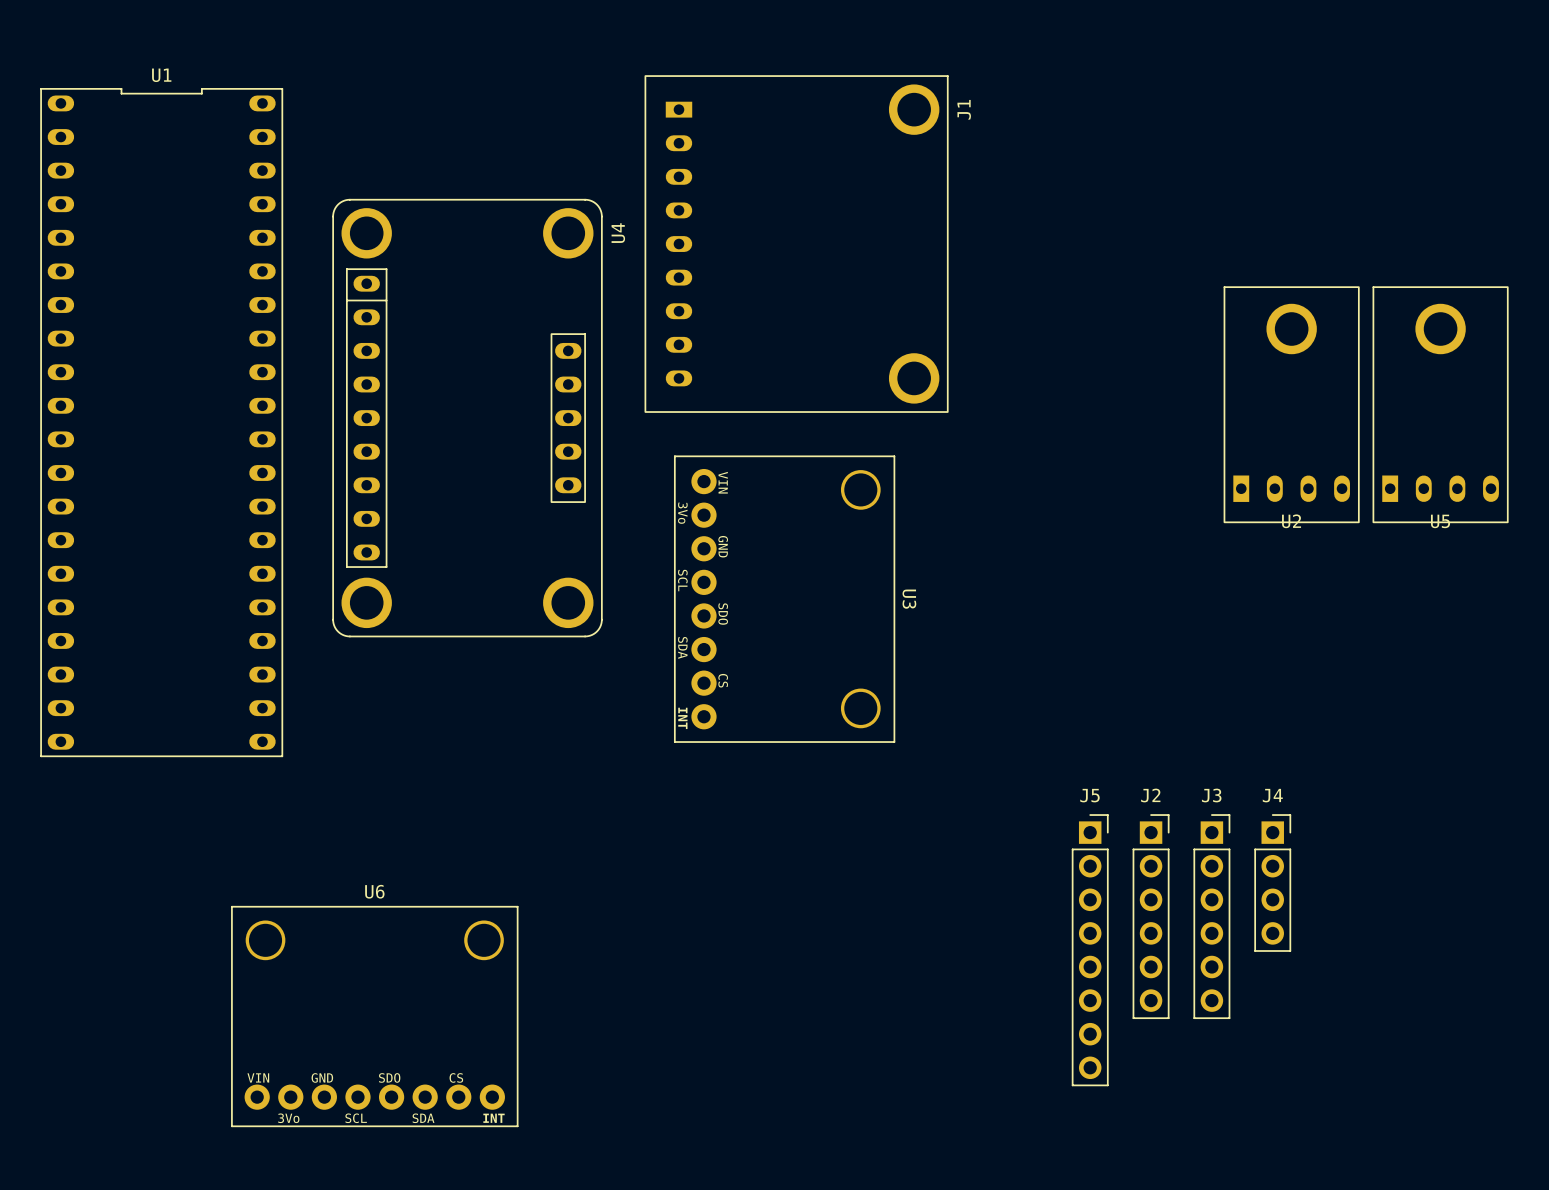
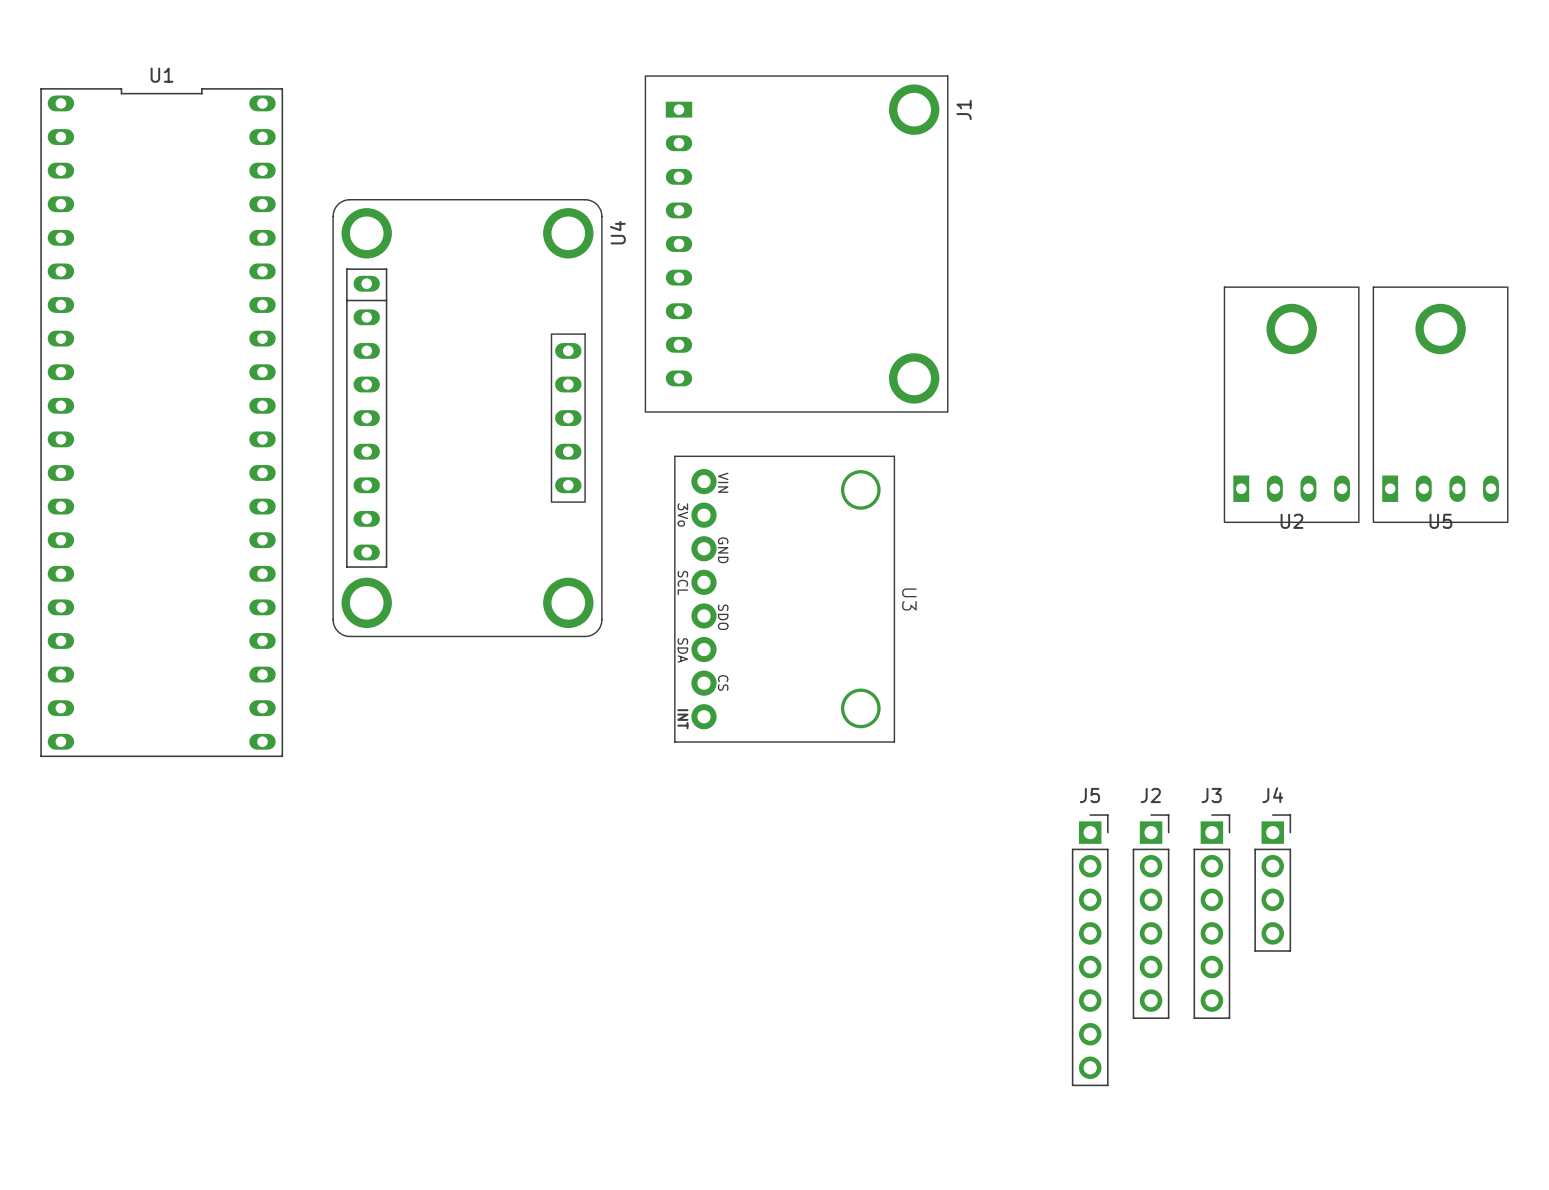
U6: (374, 1016) -> none

